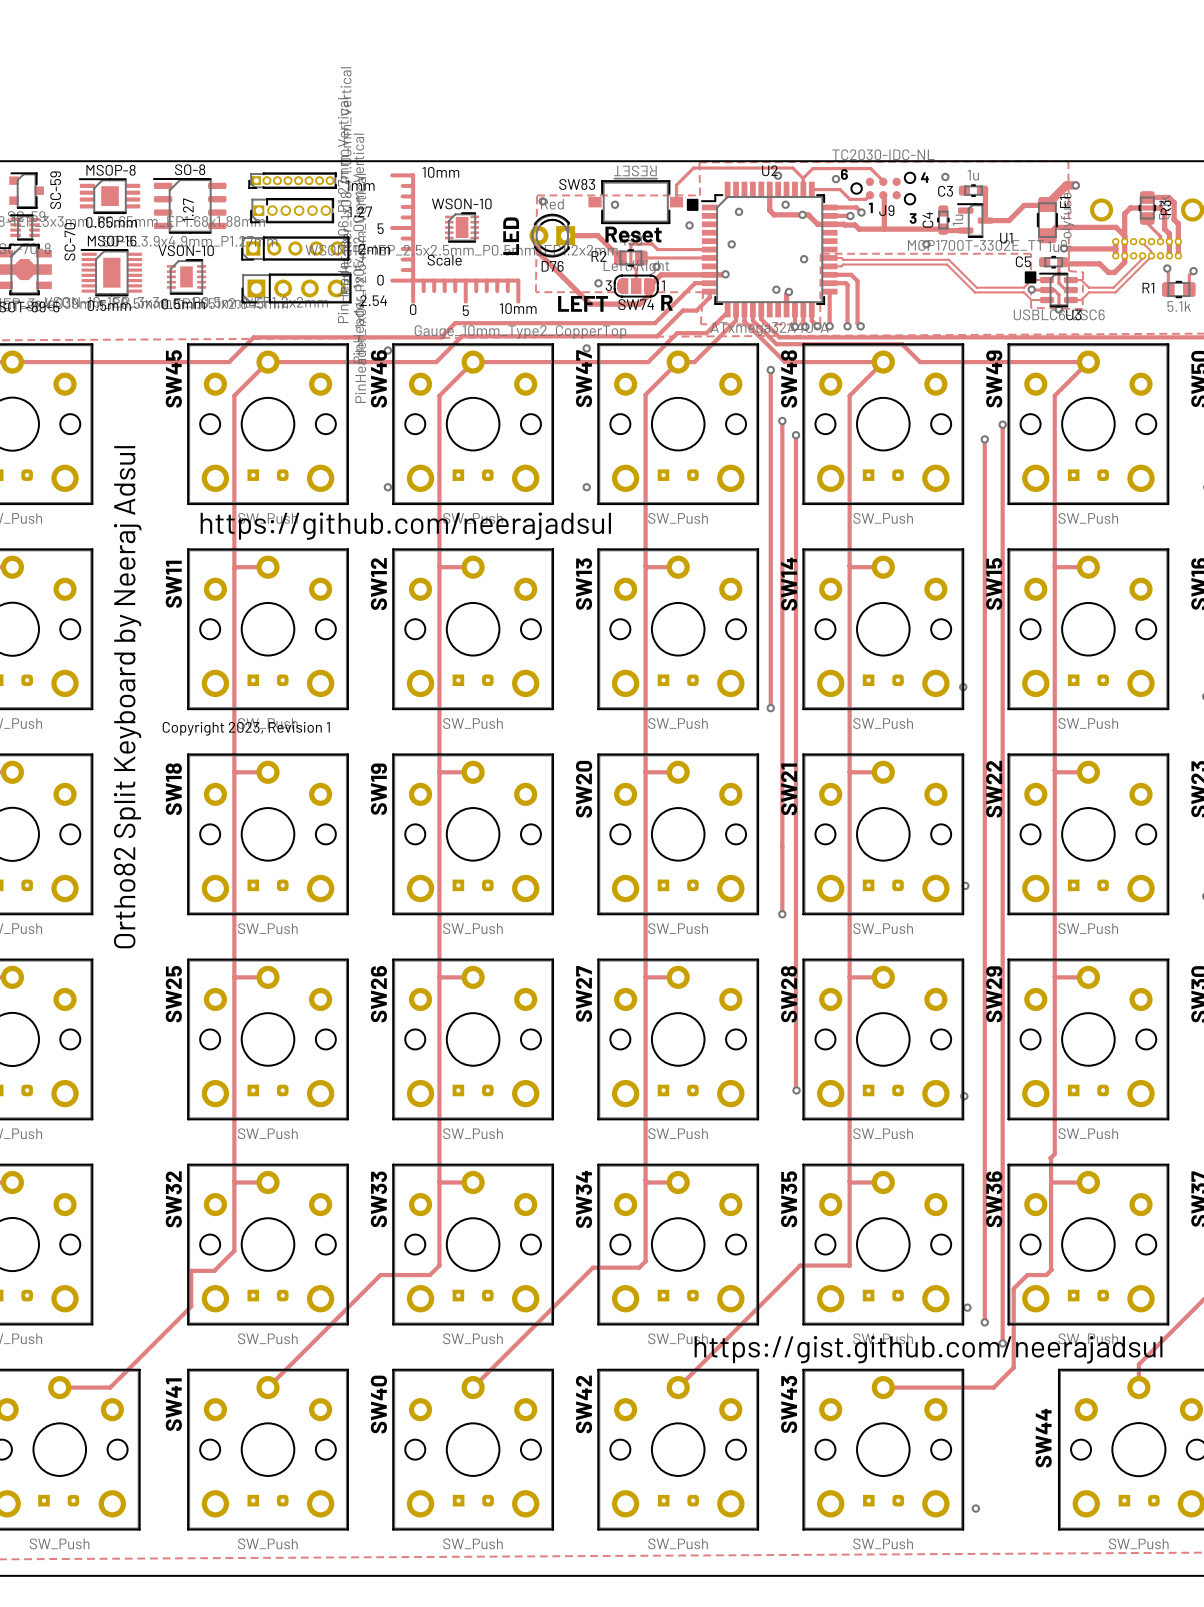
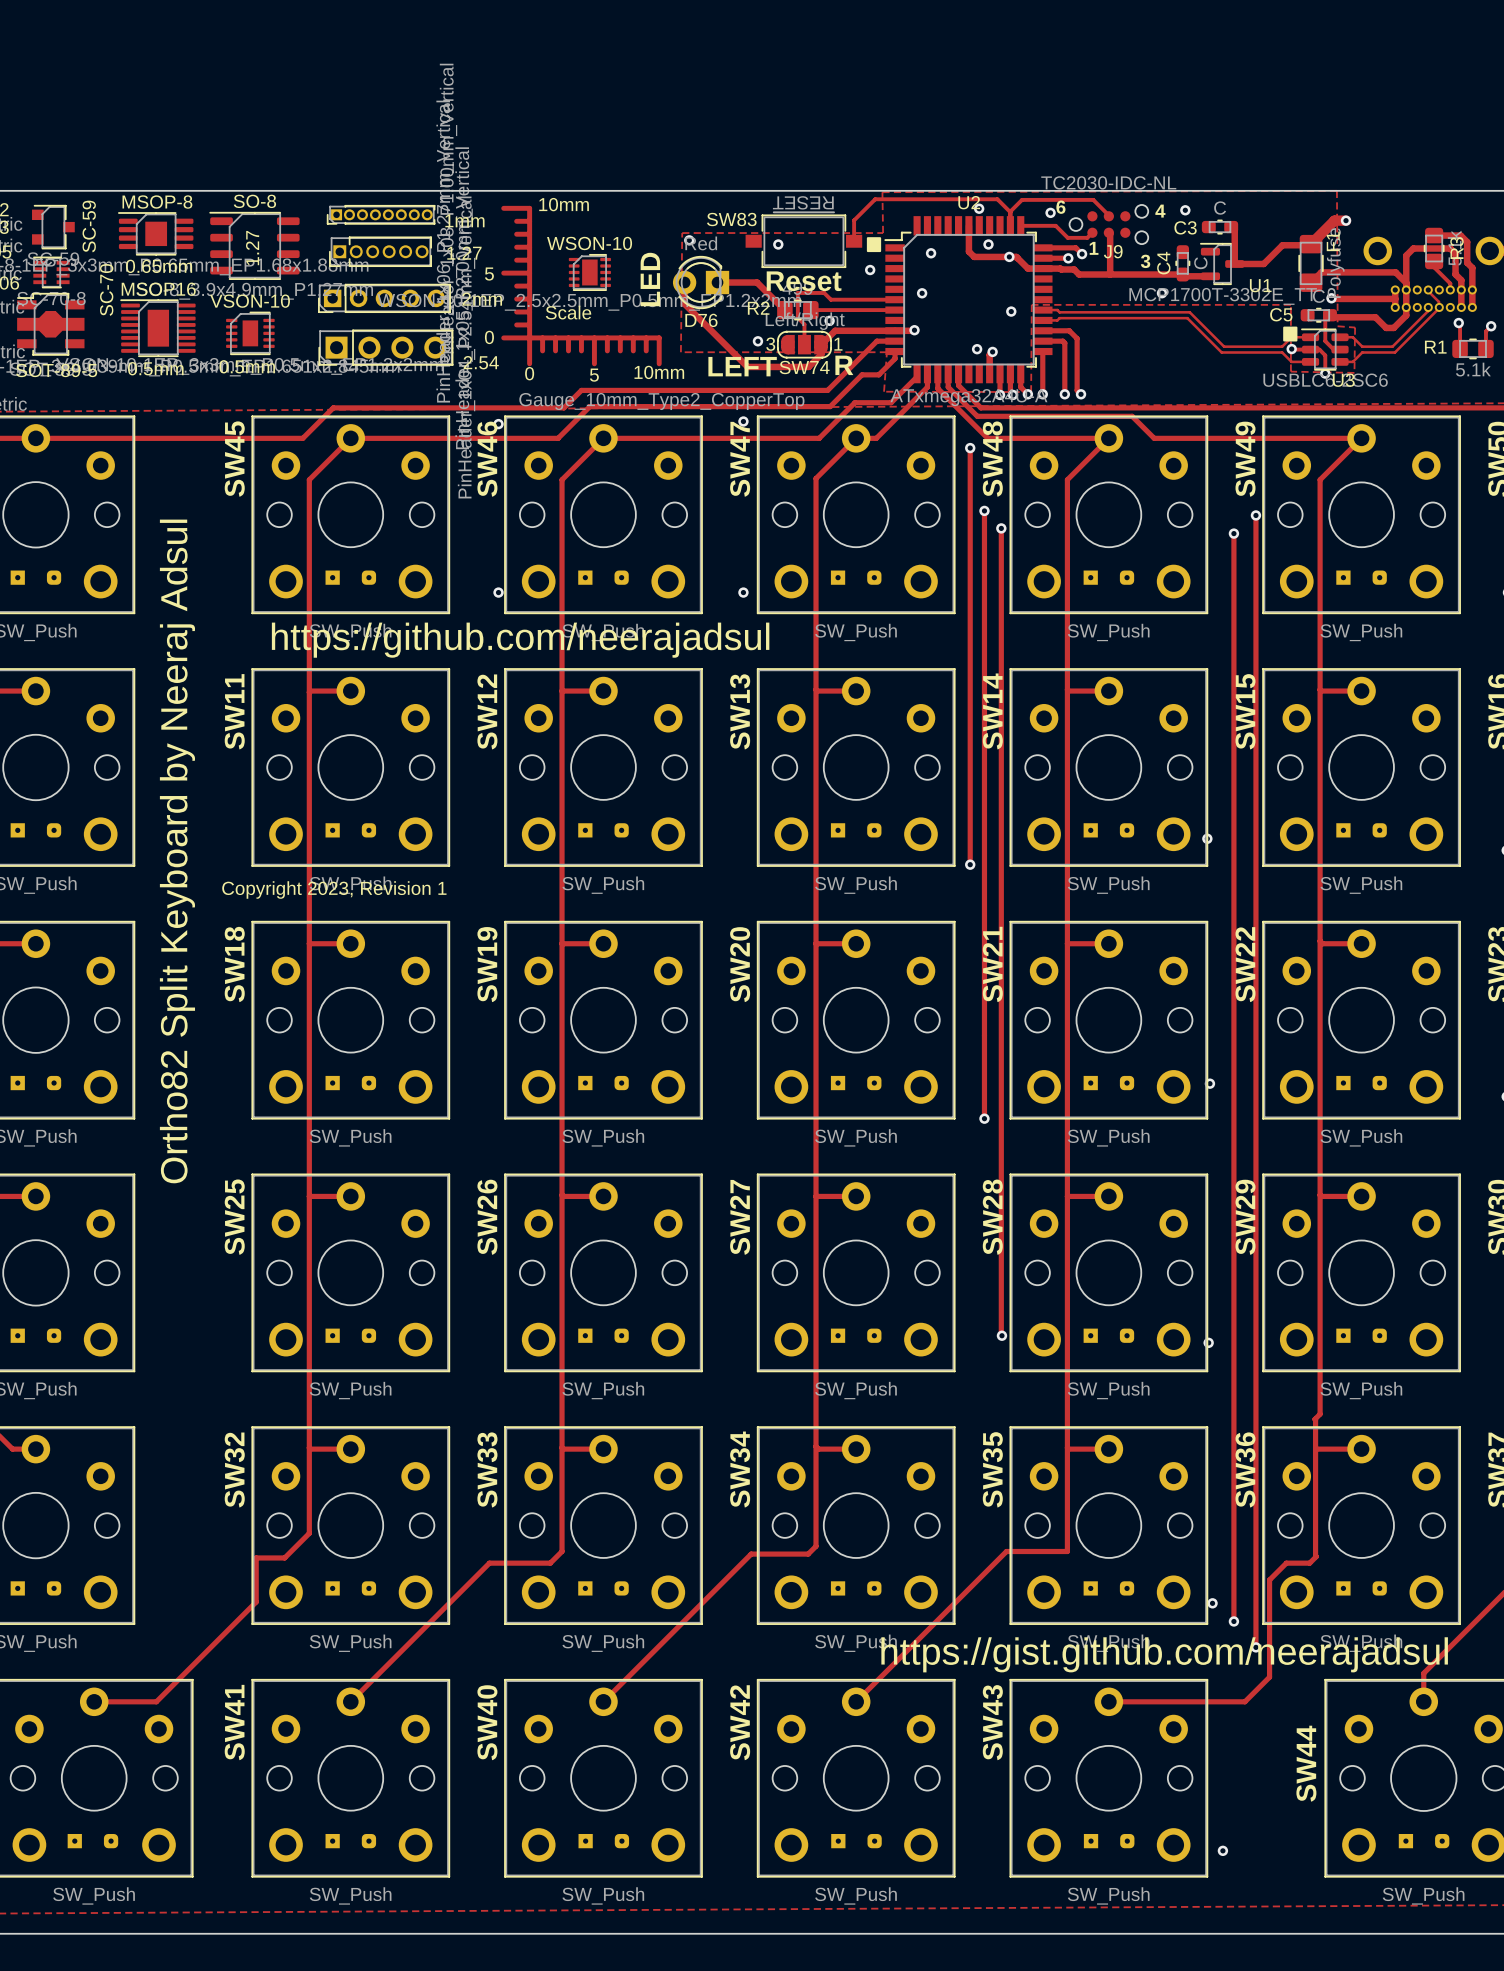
C3 value: 1u (973, 175) -> C (1220, 208)
C4 value: 1u (958, 220) -> C (1200, 263)
C5 value: 1u (1053, 246) -> C (1318, 296)

